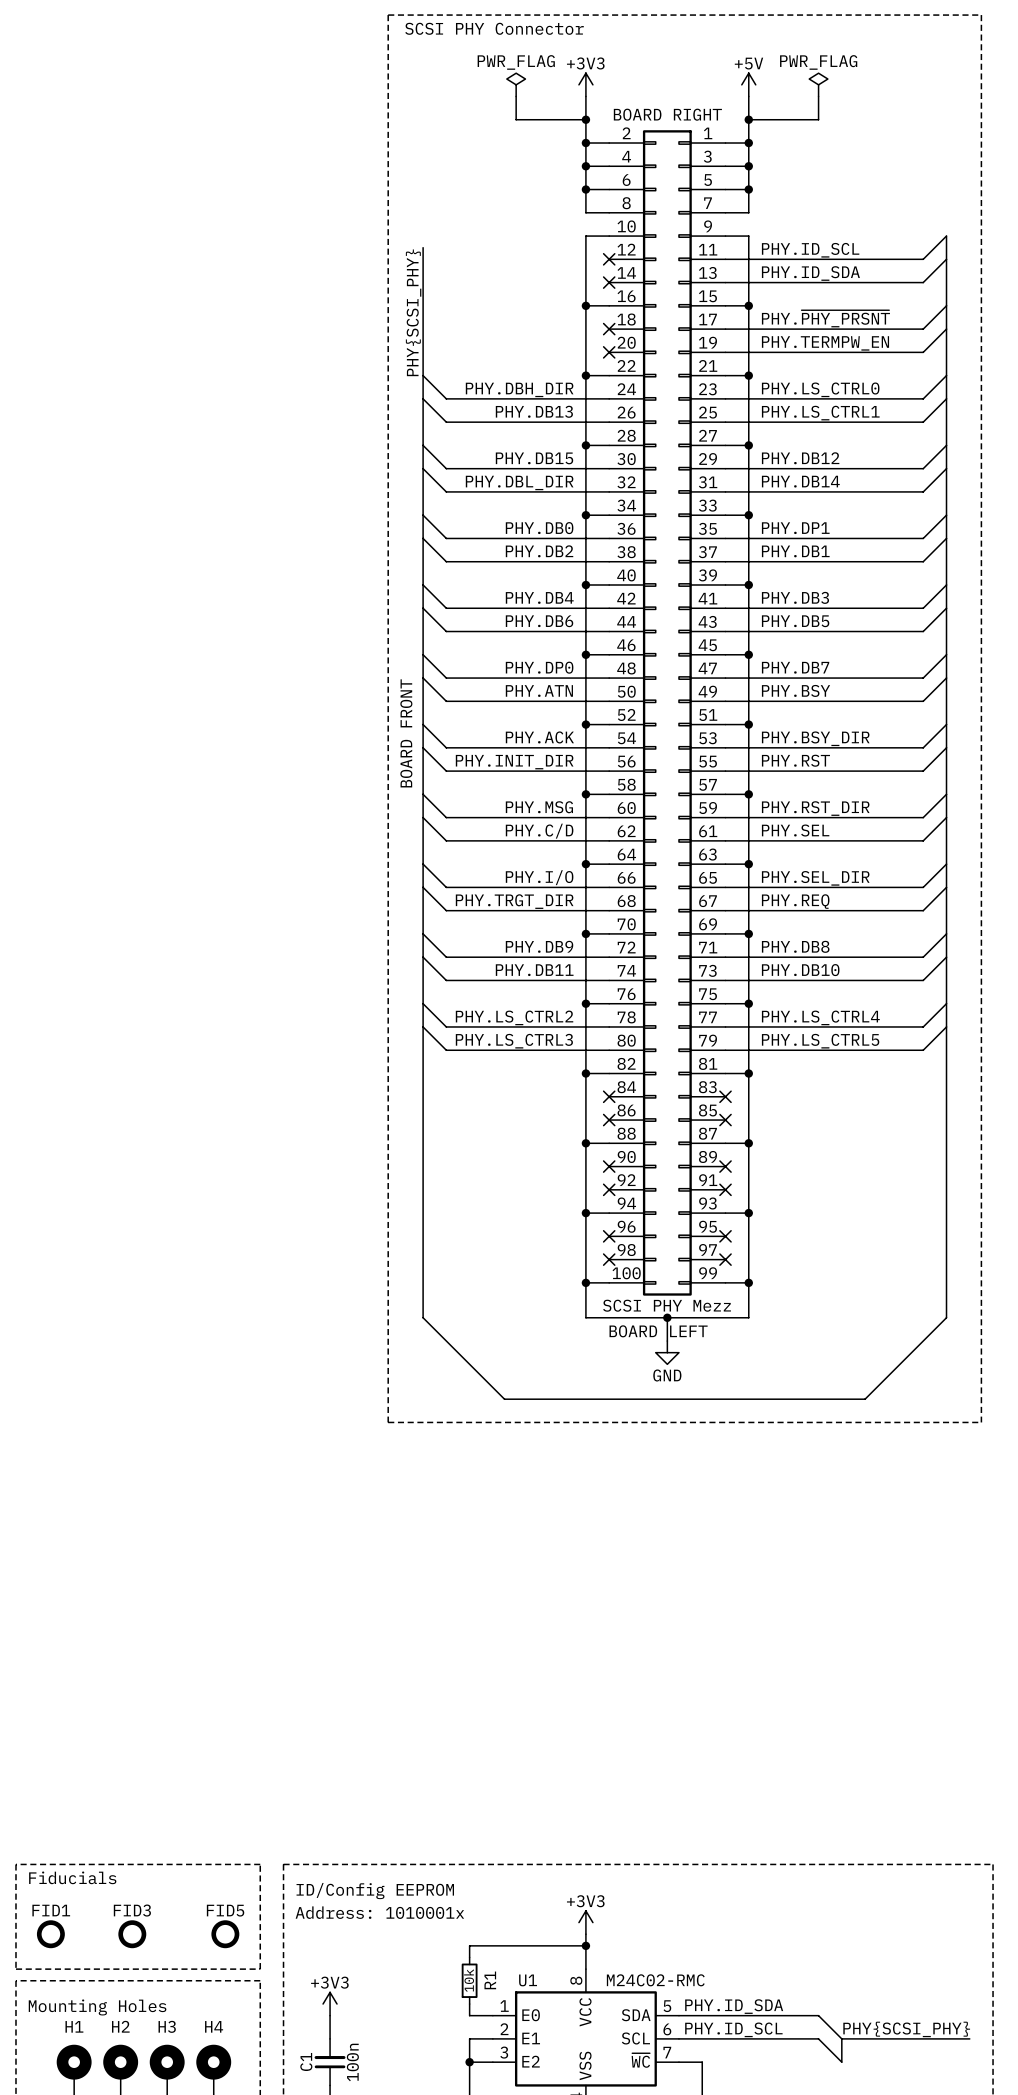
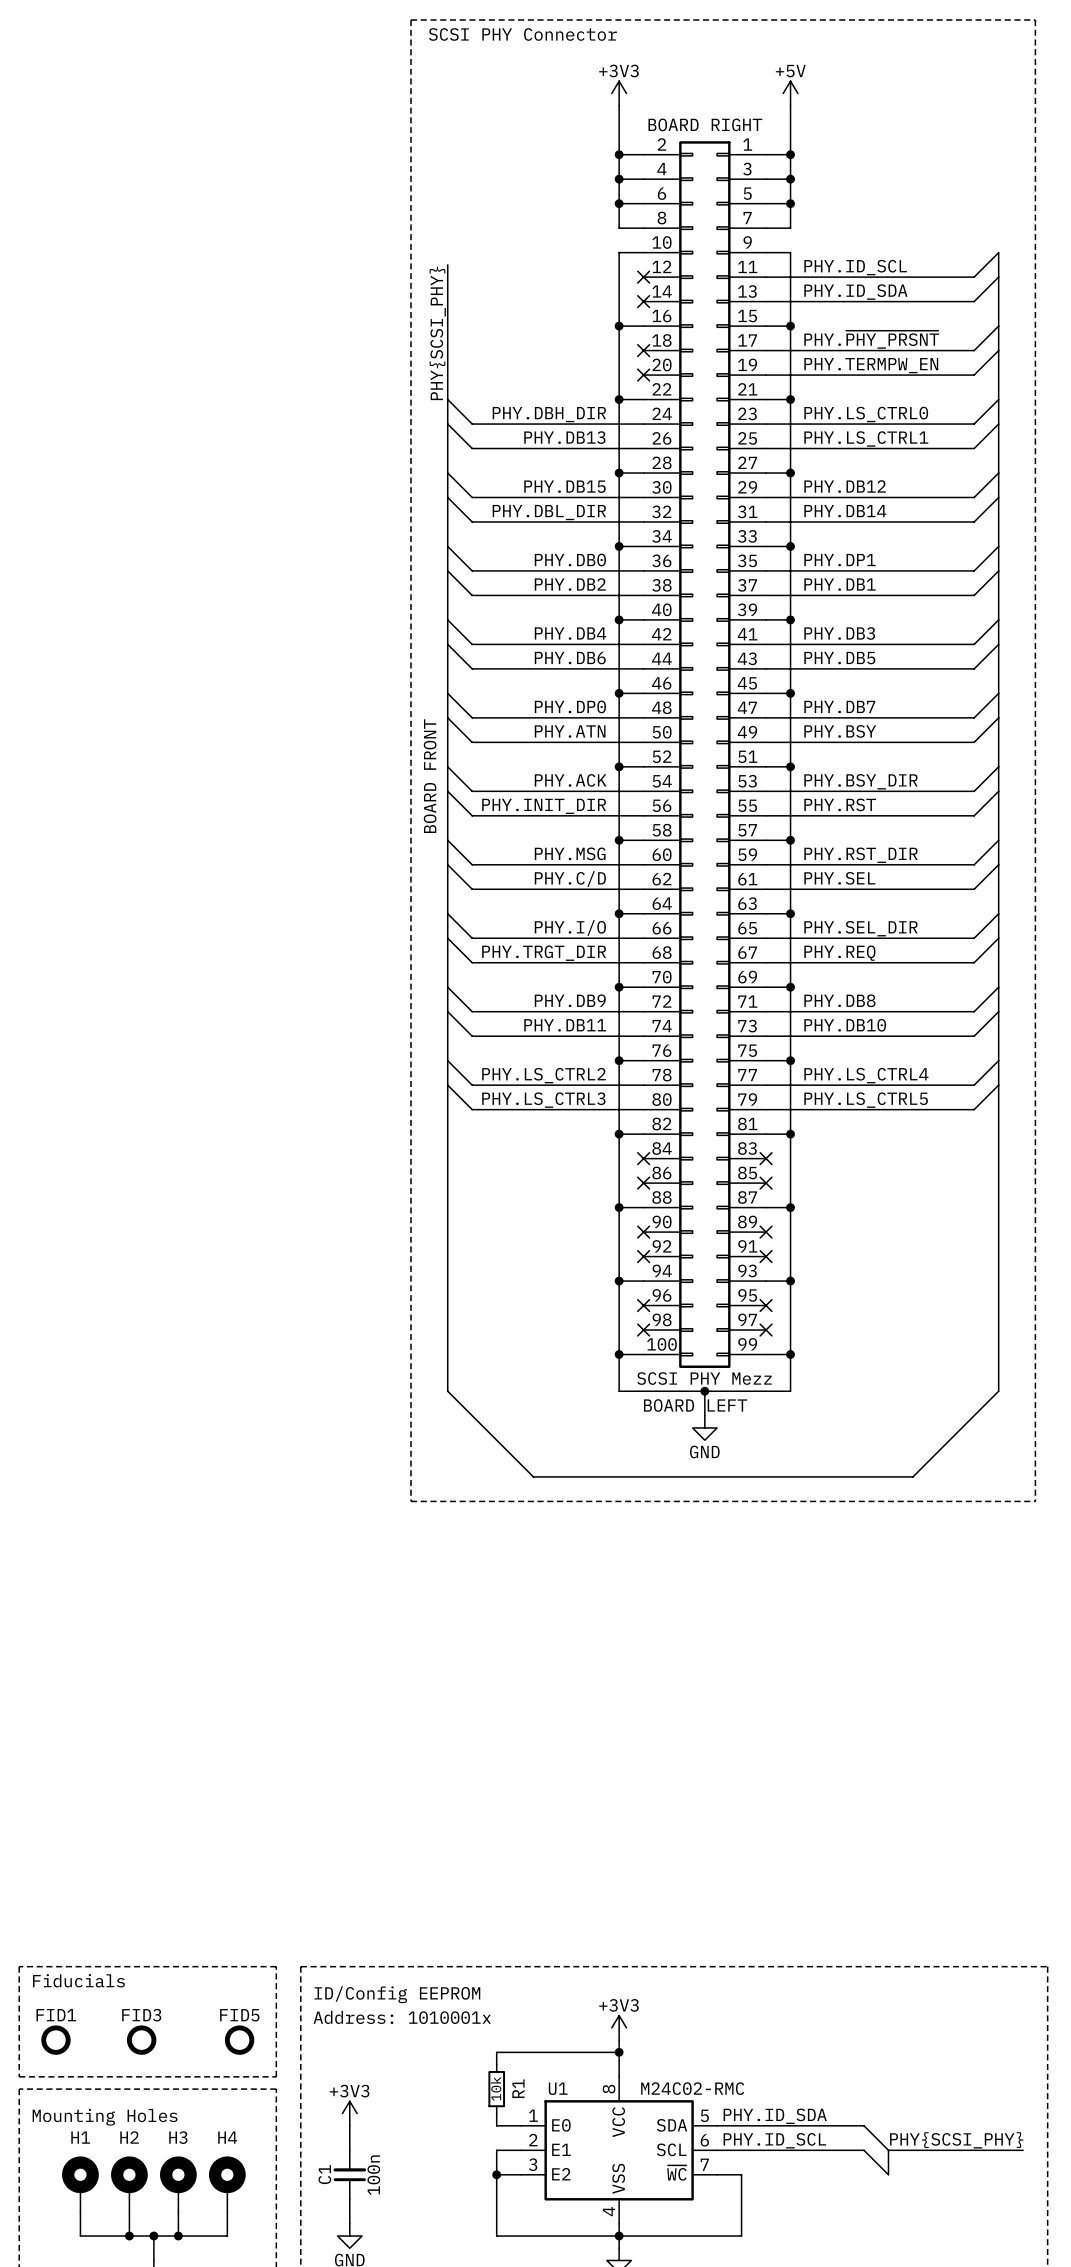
power symbol: PWR_FLAG (516, 84) -> none
power symbol: PWR_FLAG (818, 84) -> none
wire: (516, 96) (516, 119) (585, 119) -> none
wire: (818, 96) (818, 119) (748, 119) -> none
junction: (585, 119) -> none
junction: (748, 119) -> none

